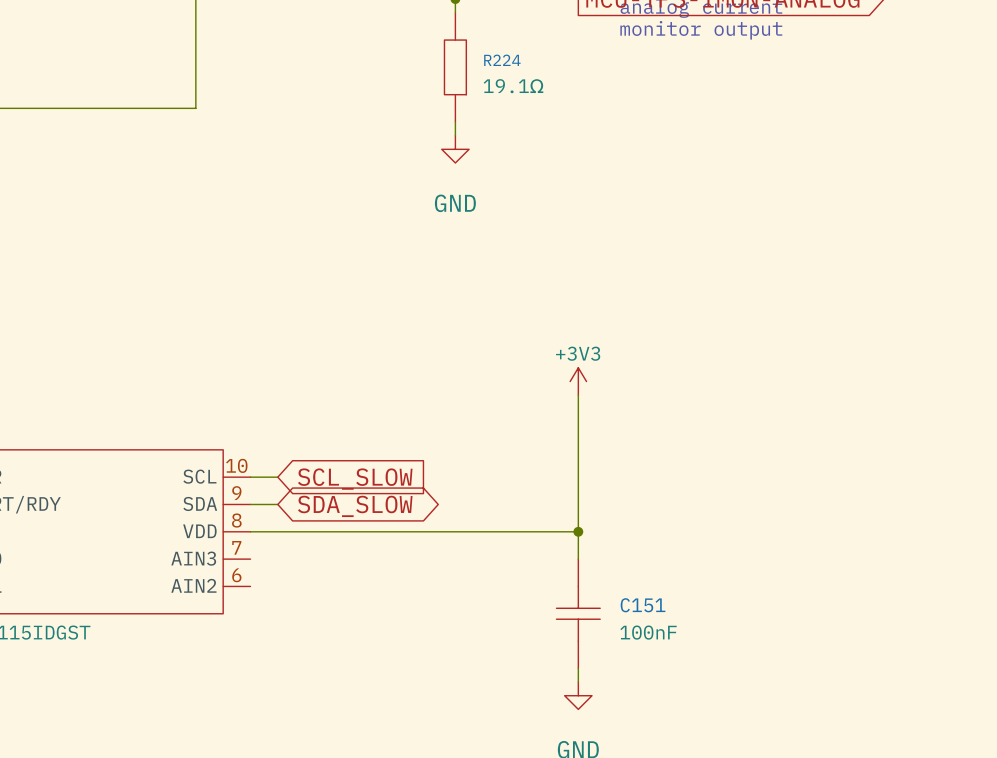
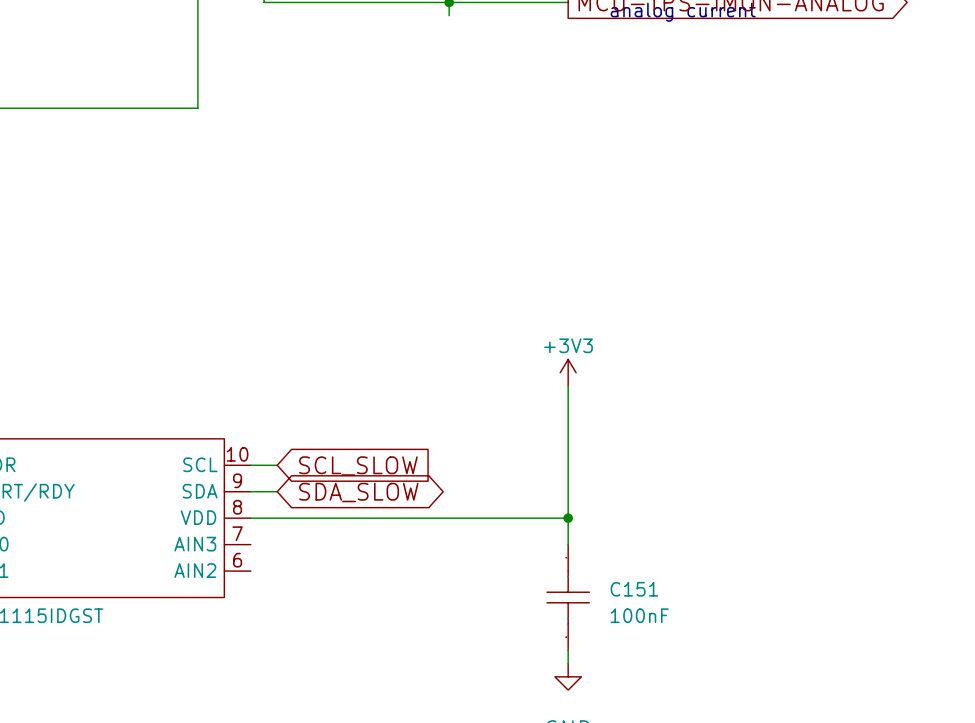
text: monitor output (701, 30) -> none
R224: 19.1Ω (455, 67) -> none
wire: (455, 122) (455, 135) -> none
power symbol: GND (455, 149) -> none

